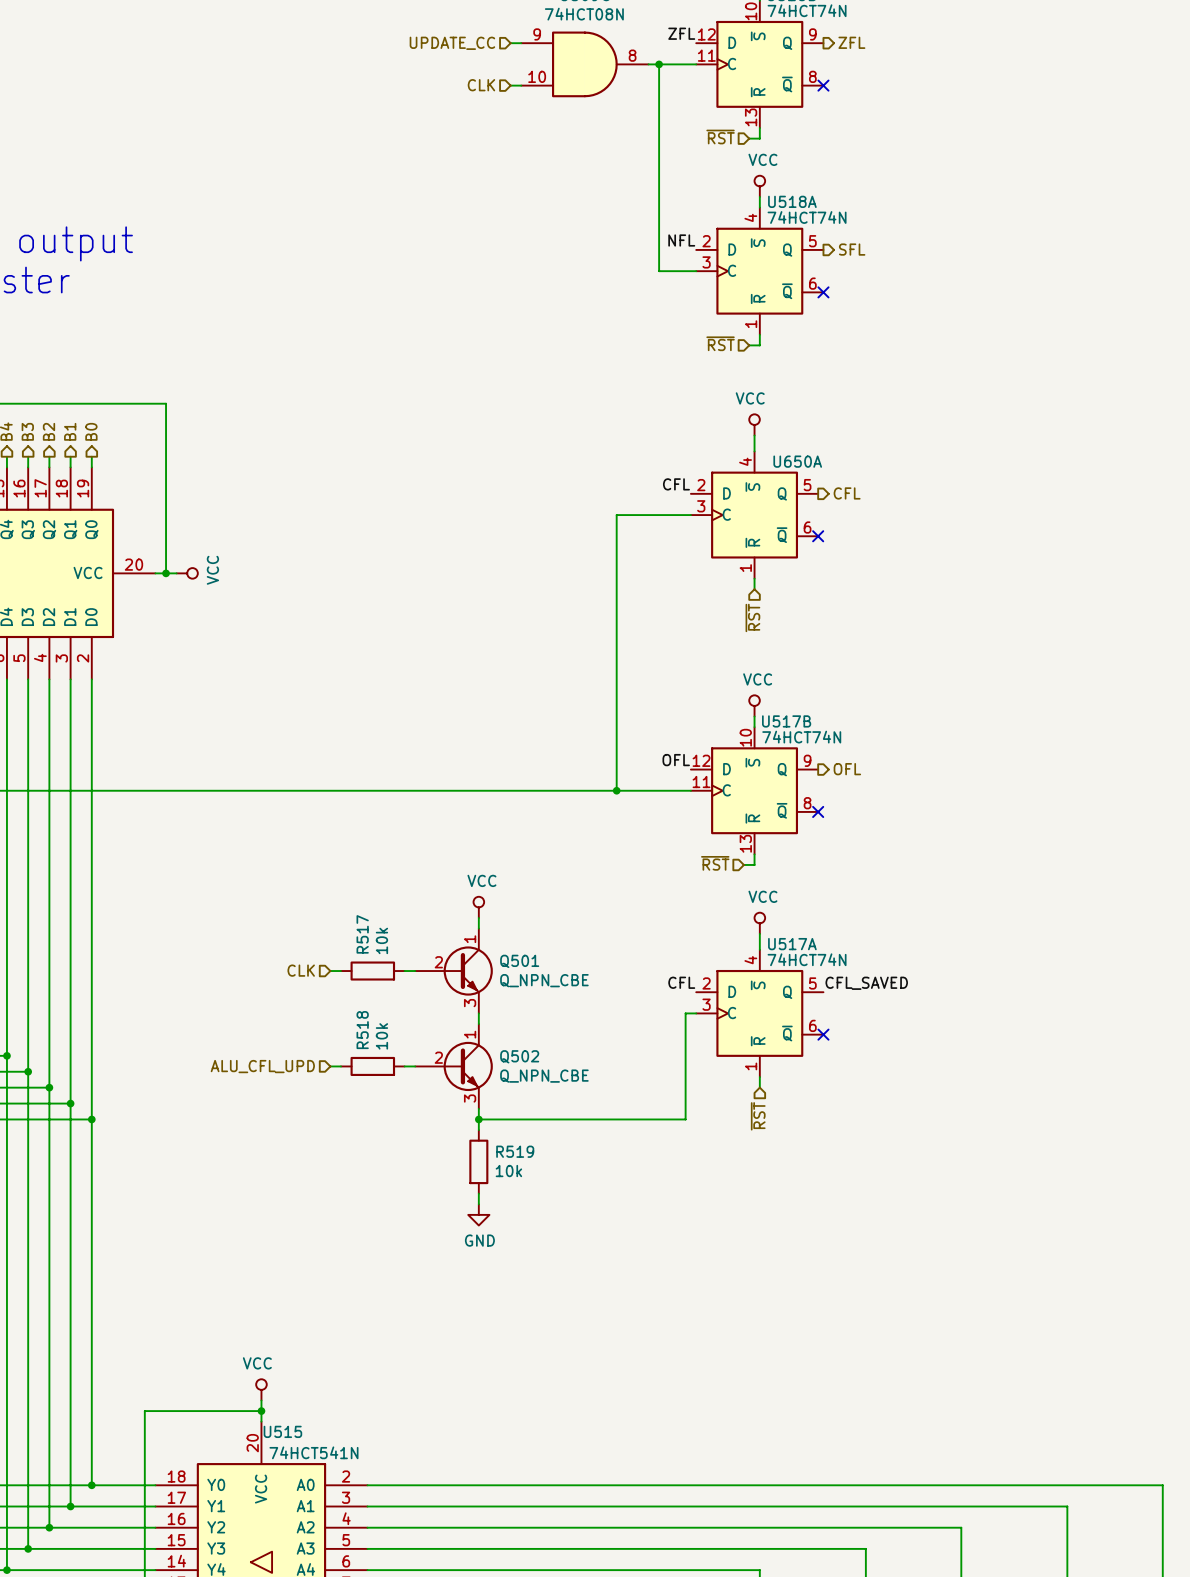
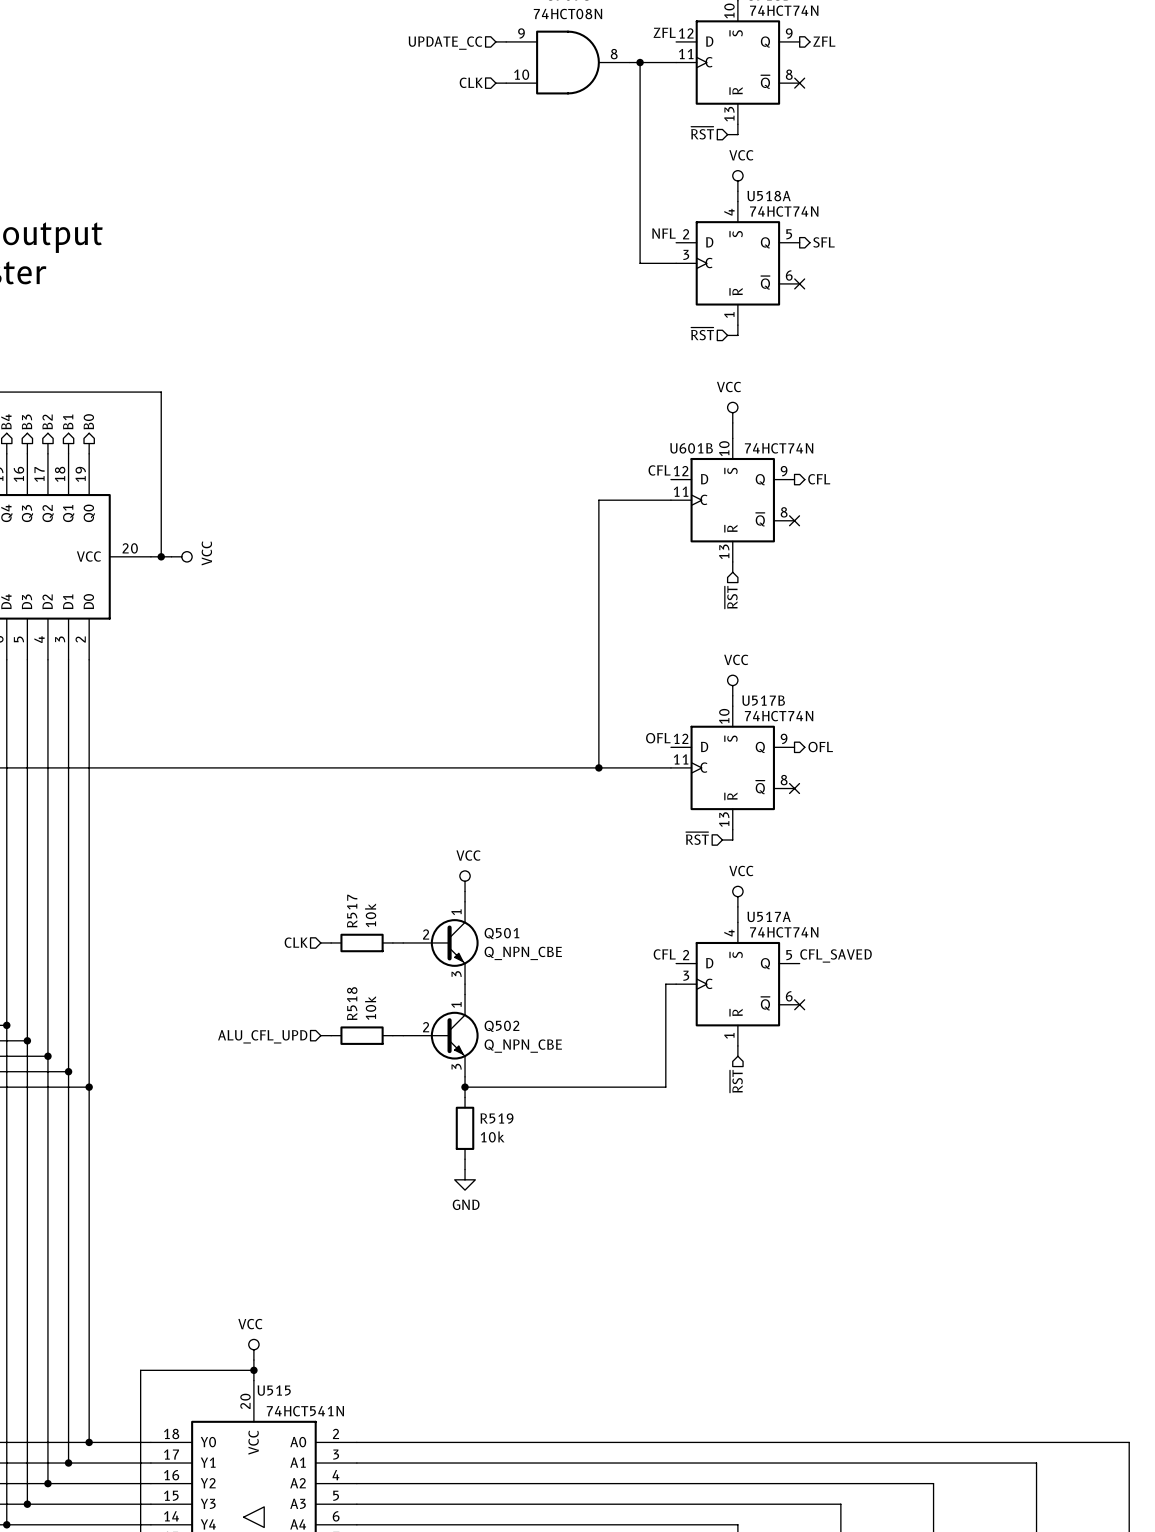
U650A pin number: 4 (745, 461) -> 10 (724, 448)
U650A name: U650A (797, 461) -> U601B (691, 448)
U650A value: none -> 74HCT74N (779, 448)
U650A pin number: 2 (701, 485) -> 12 (681, 471)
U650A pin number: 5 (807, 485) -> 9 (784, 471)
U650A pin number: 3 (701, 506) -> 11 (681, 491)
U650A pin number: 6 (807, 527) -> 8 (784, 512)
U650A pin number: 1 (745, 568) -> 13 (724, 551)

